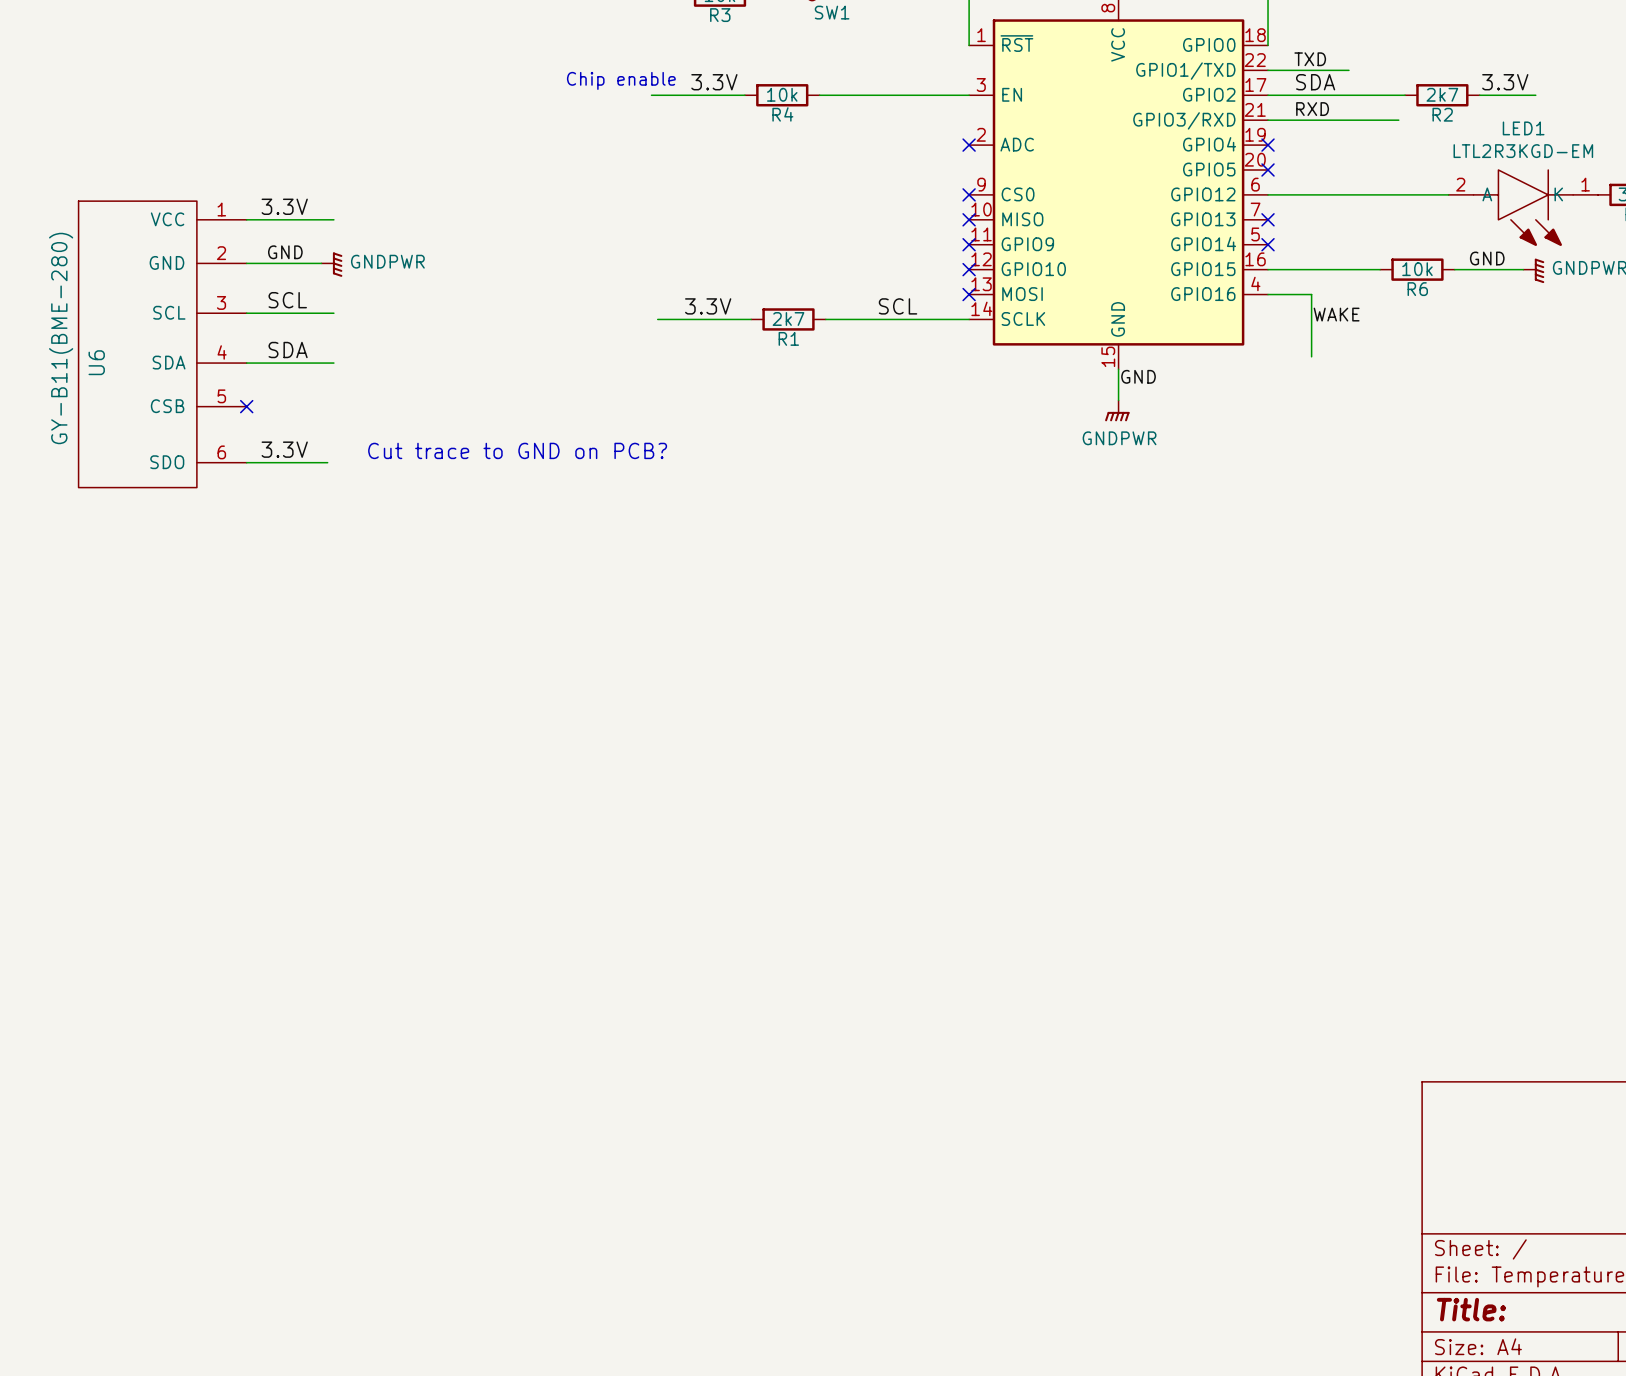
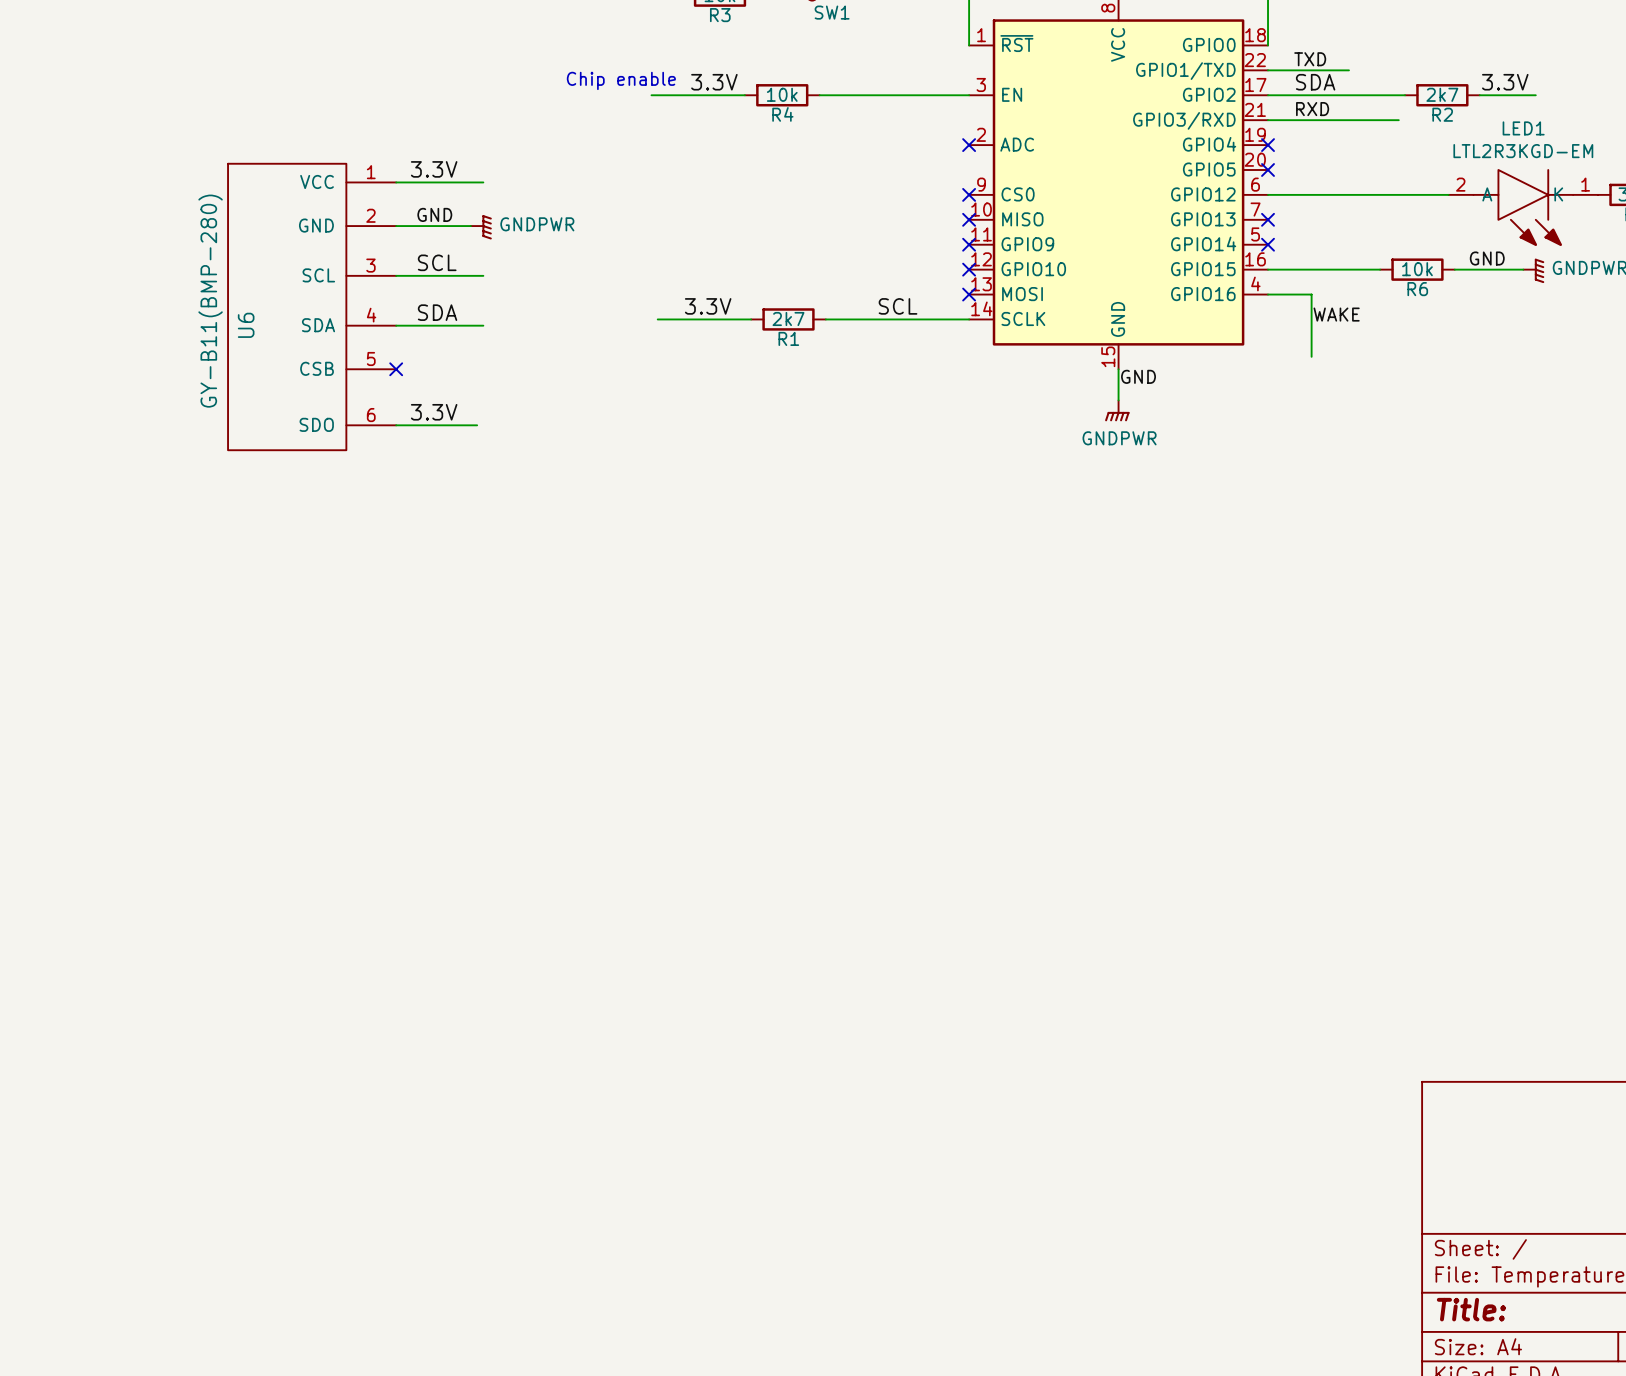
label: none -> 3.3V (434, 169)
label: 3.3V (284, 206) -> none
wire: (246, 219) (333, 219) -> (396, 182) (483, 182)
label position: GND (285, 252) -> GND (434, 214)
wire: (246, 263) (321, 263) -> (396, 226) (470, 226)
power symbol position: GNDPWR (331, 264) -> GNDPWR (481, 227)
label position: SCL (287, 300) -> SCL (437, 262)
wire: (246, 313) (333, 313) -> (396, 275) (483, 275)
U6 value: GY-B11(BME-280) (61, 338) -> GY-B11(BMP-280) (210, 301)
U6 position: (162, 350) -> (312, 313)
label position: SDA (288, 350) -> SDA (437, 312)
wire: (246, 363) (333, 363) -> (396, 325) (483, 325)
no-connect mark: none -> (396, 369)
no-connect mark: (246, 406) -> none
label: none -> 3.3V (434, 412)
label: 3.3V (284, 449) -> none
text: Cut trace to GND on PCB? (517, 450) -> none
wire: (246, 462) (327, 462) -> (396, 425) (477, 425)

